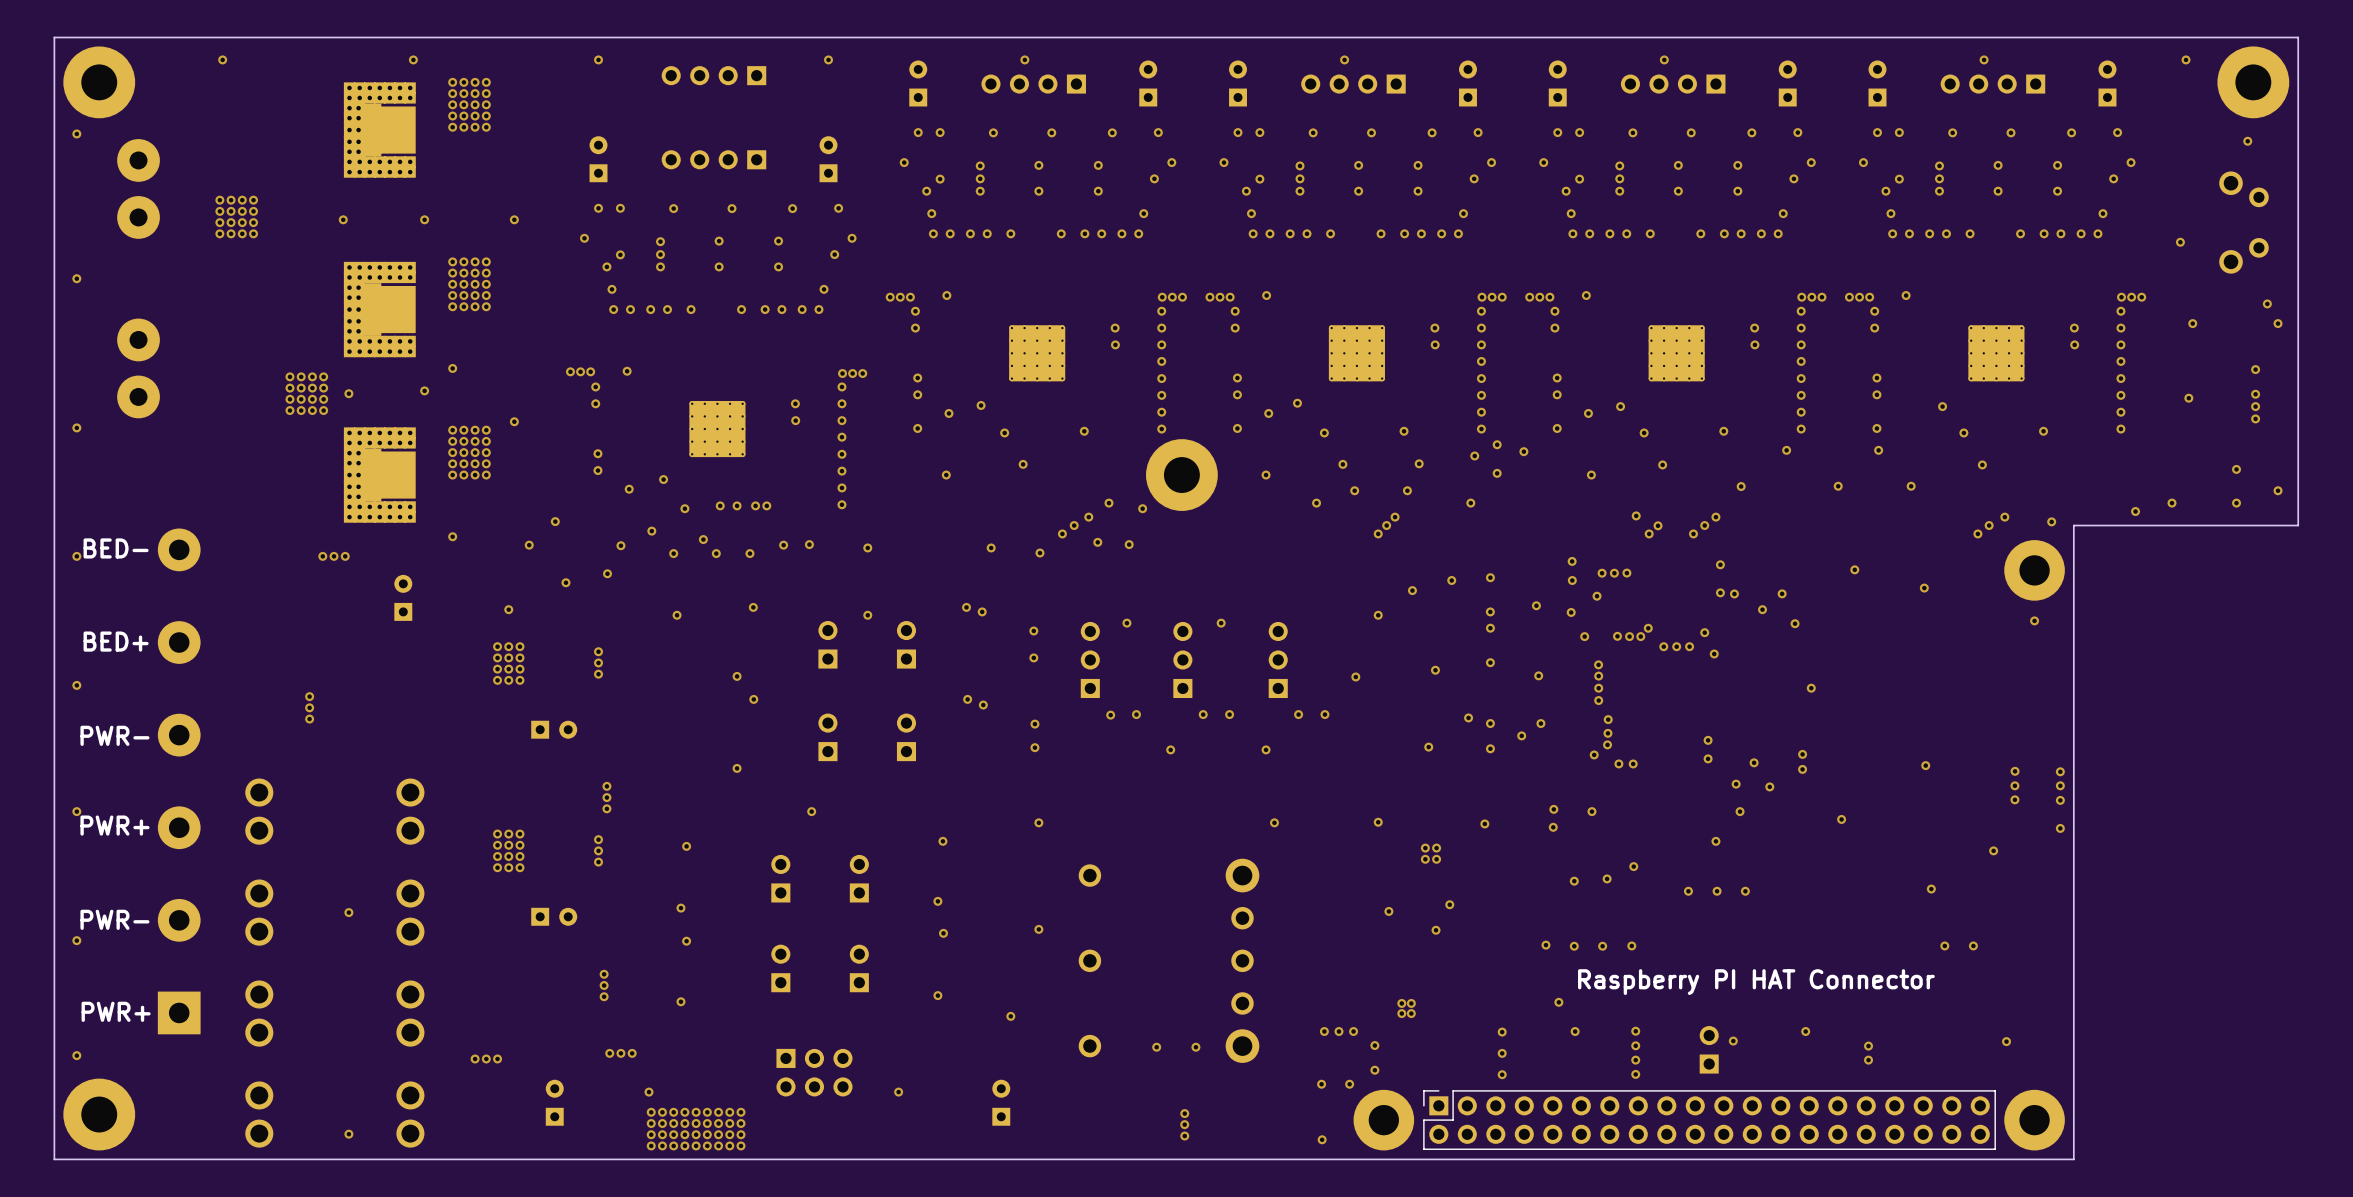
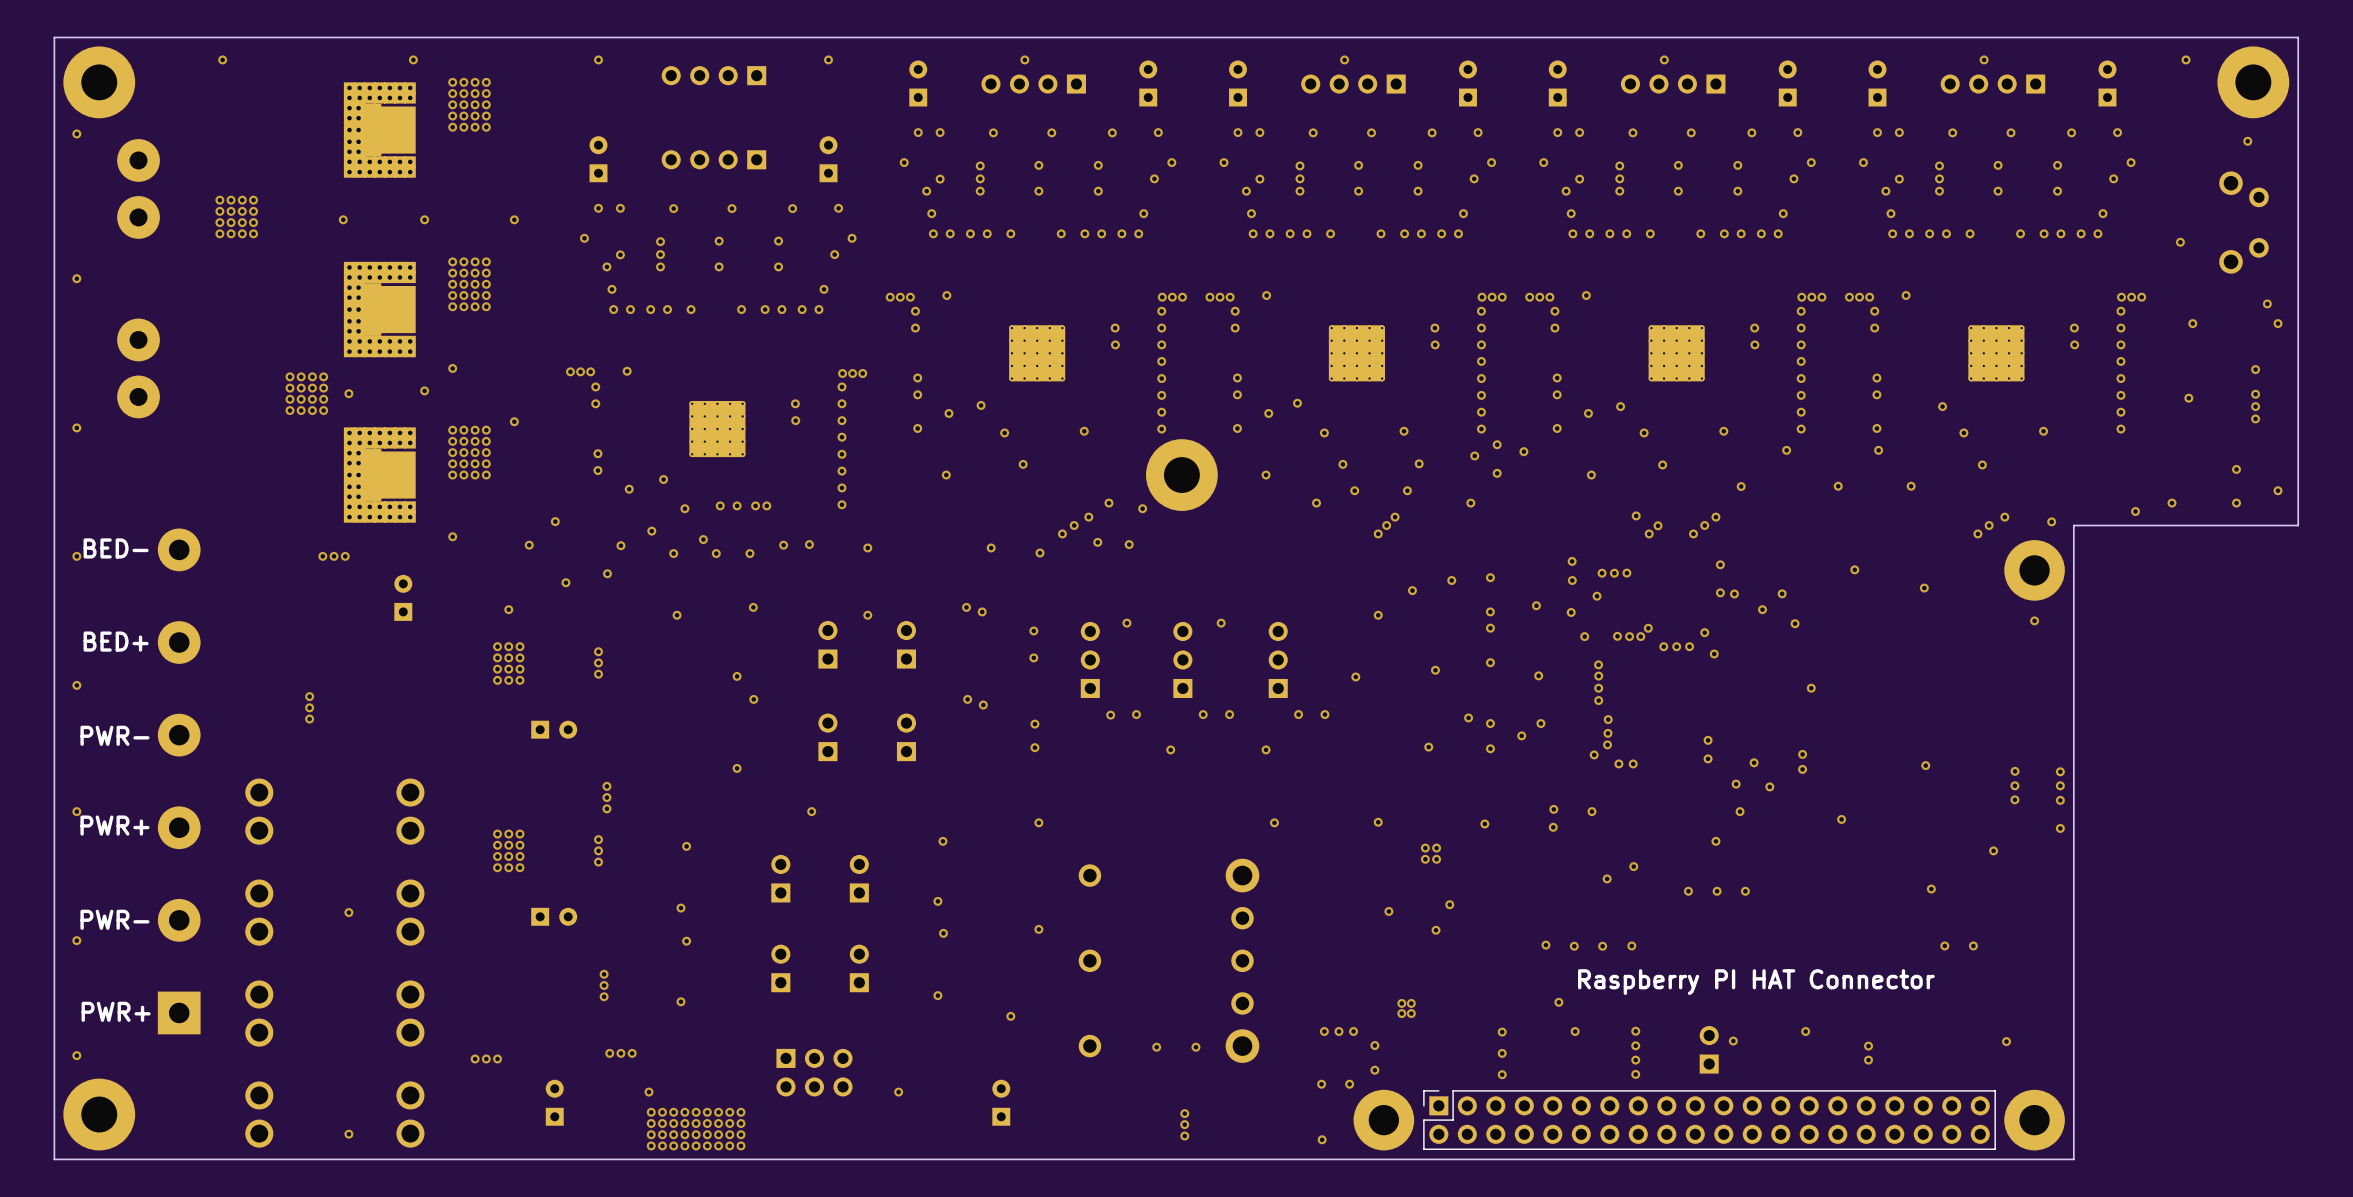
via: (1574, 881) -> none

